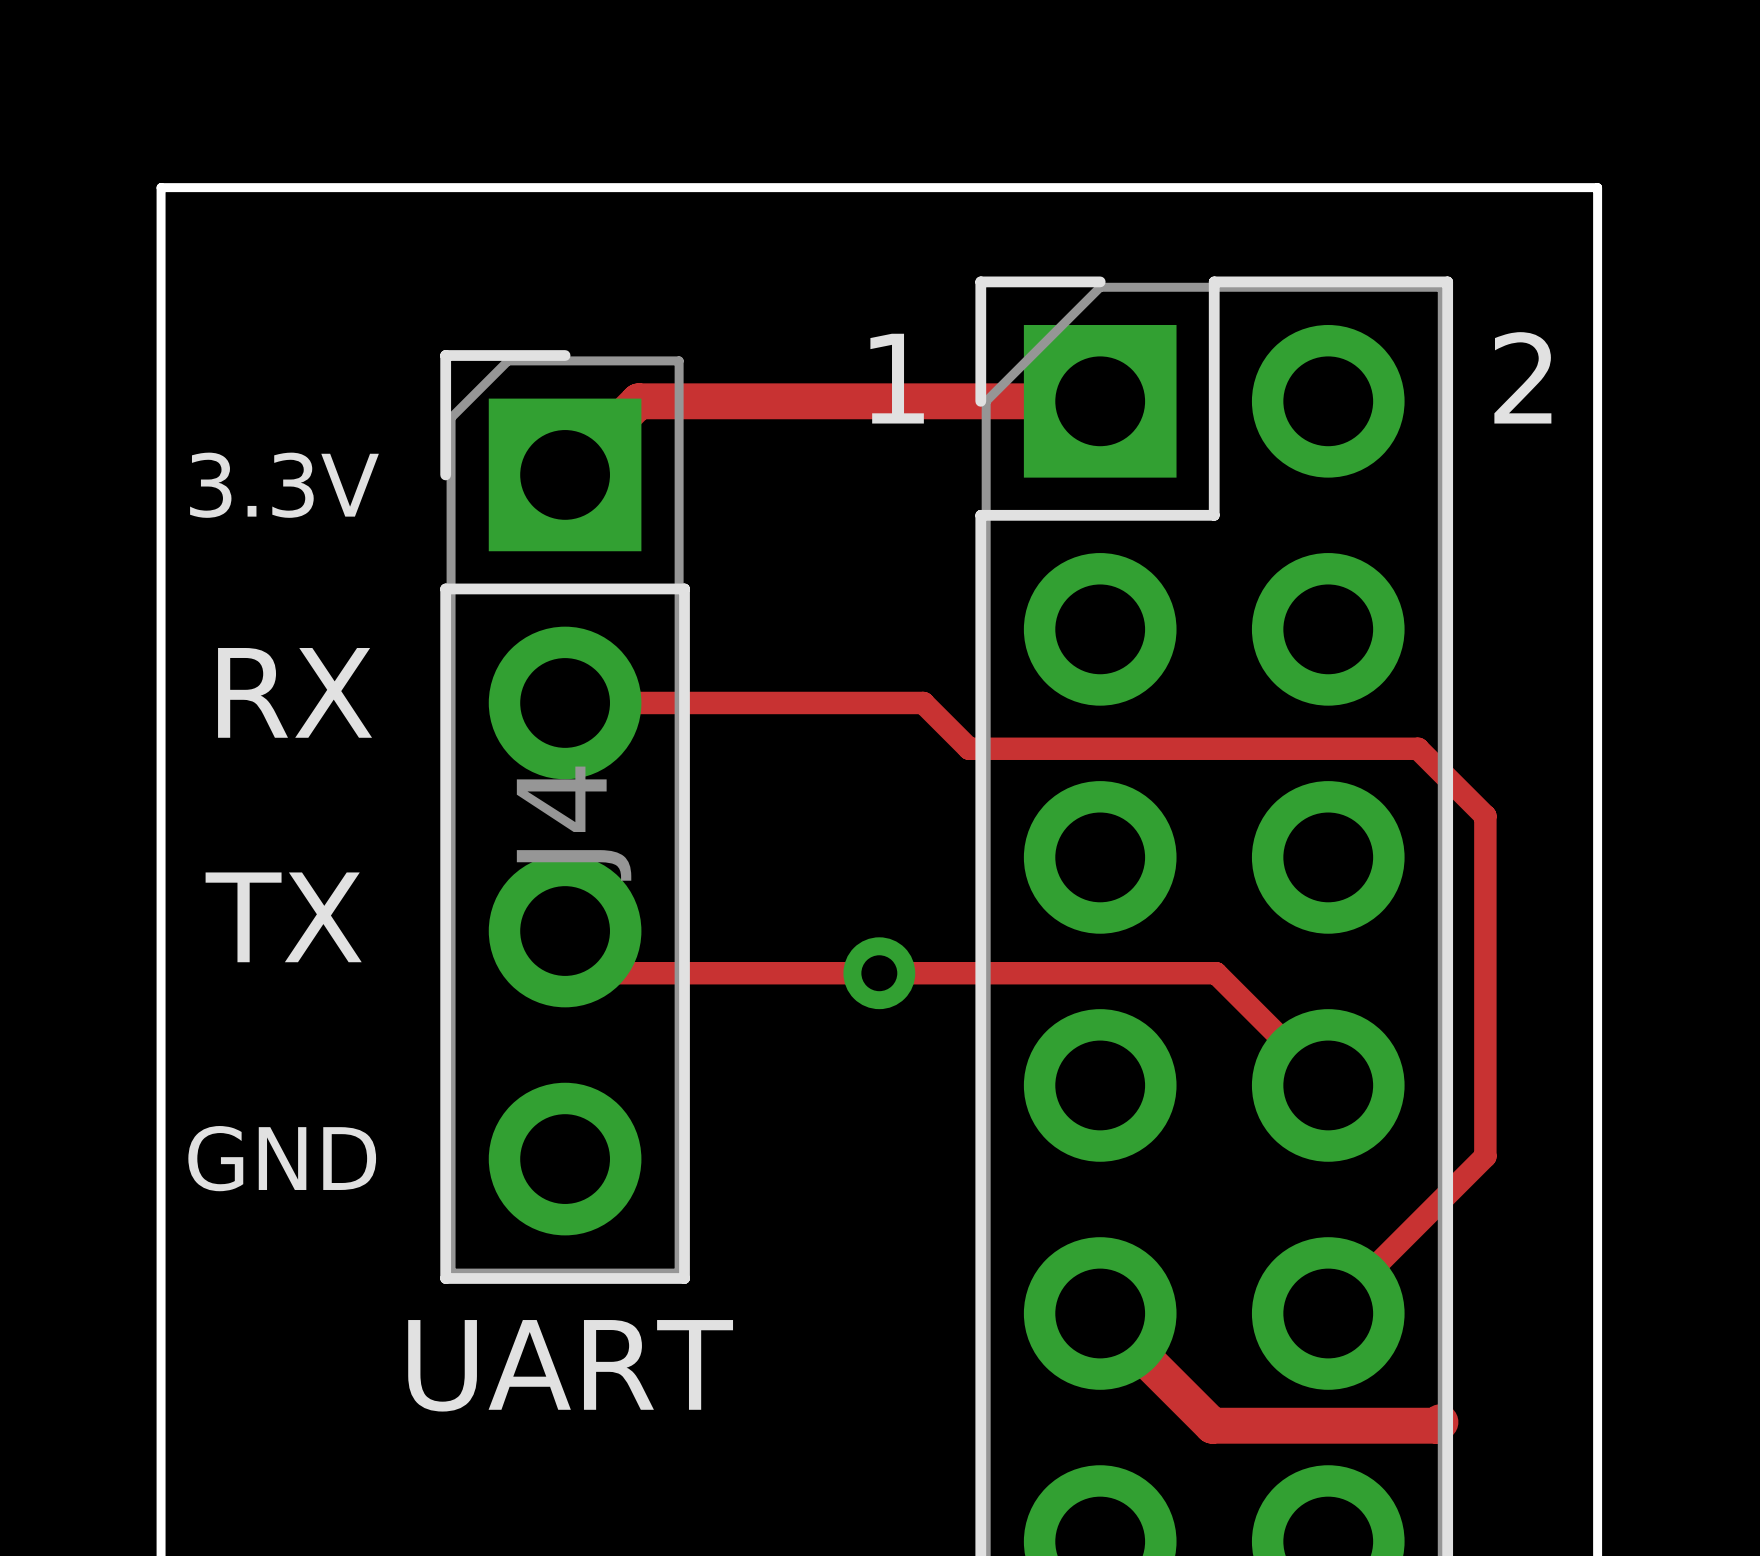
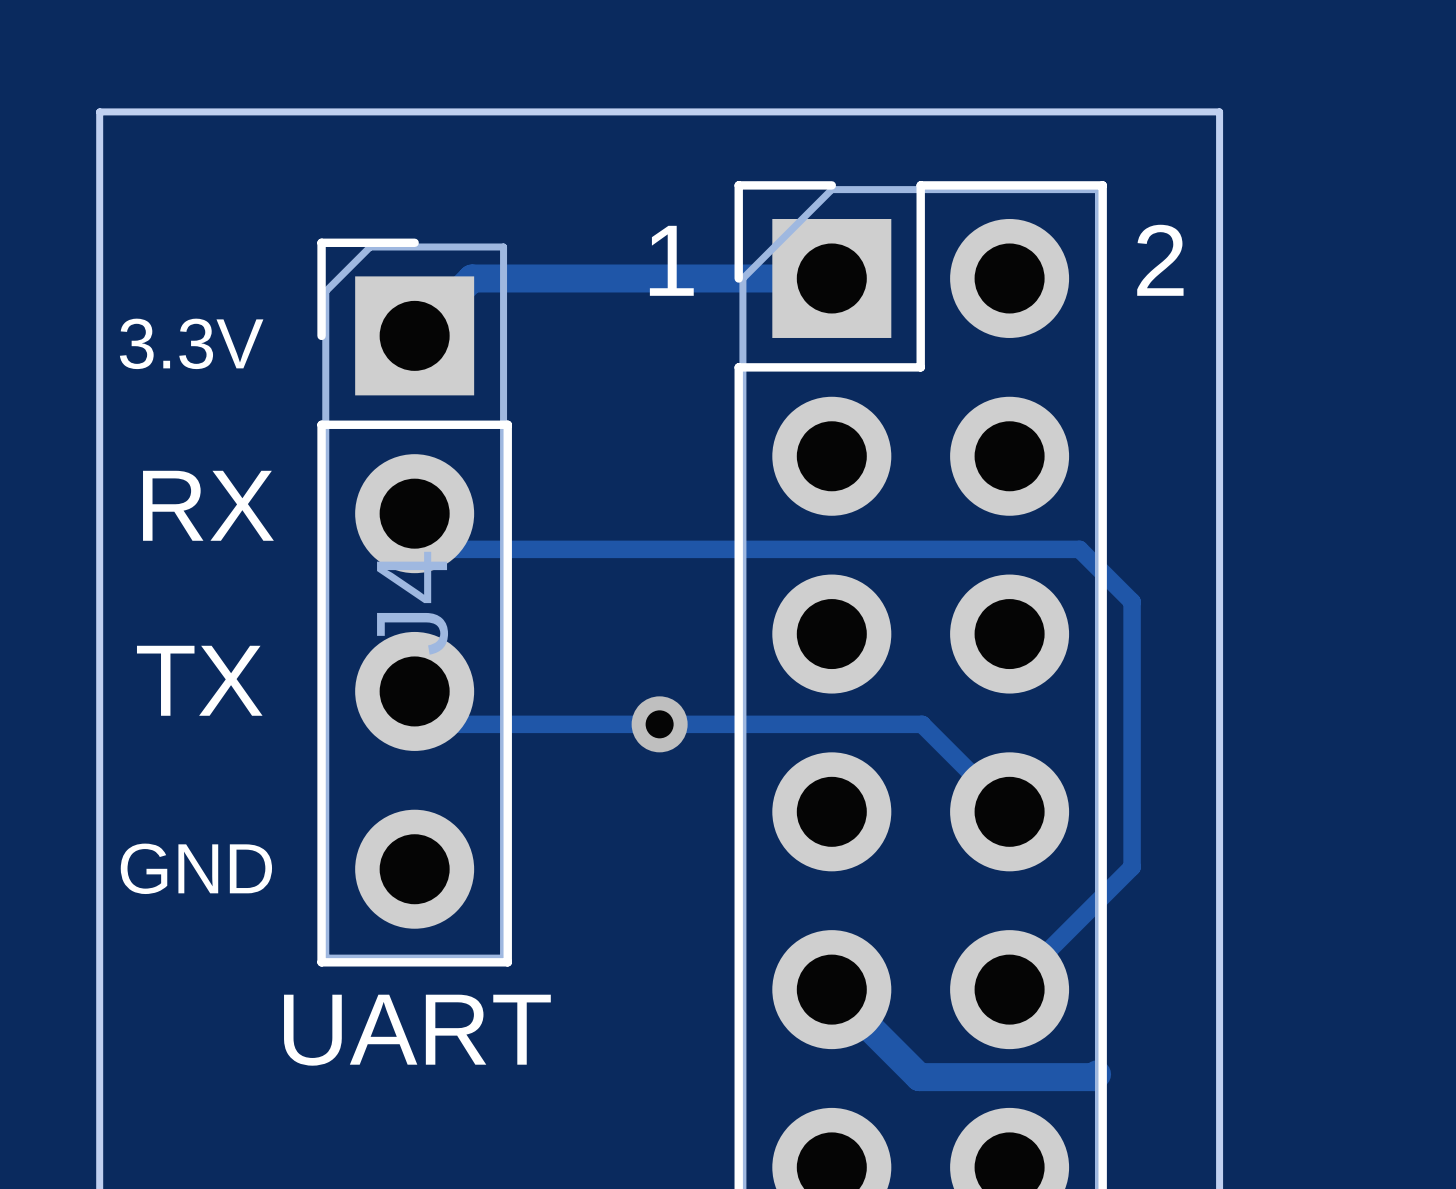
track: (565, 702) (923, 702) (969, 748) -> (414, 513) (450, 549) (729, 549)

